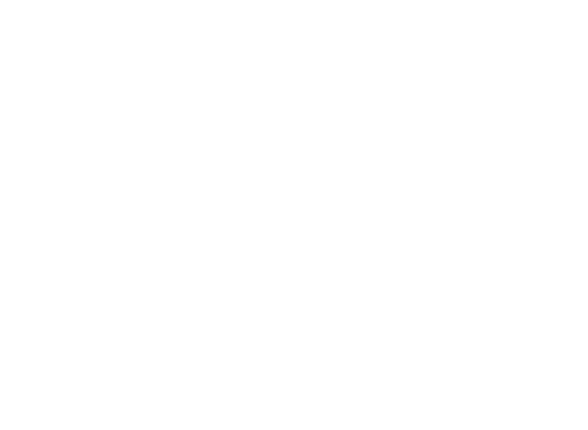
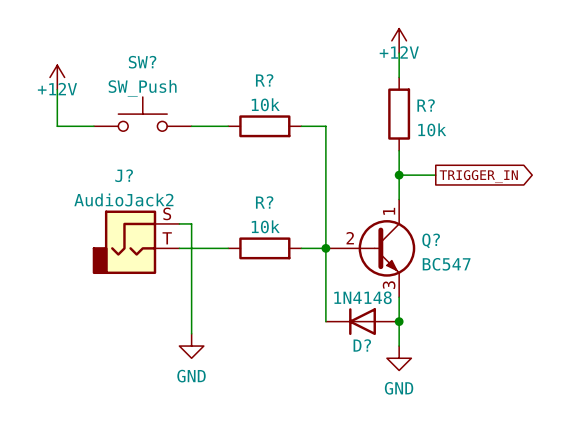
power symbol: none -> +12V (399, 40)
wire: none -> (399, 53) (399, 77)
power symbol: none -> +12V (57, 77)
wire: none -> (57, 89) (57, 126) (93, 126)
SW?: none -> SW_Push (142, 114)
R?: none -> 10k (399, 114)
wire: none -> (191, 126) (228, 126)
R?: none -> 10k (264, 126)
wire: none -> (301, 126) (325, 126) (325, 321)
wire: none -> (399, 150) (399, 199)
wire: none -> (399, 175) (435, 175)
junction: none -> (399, 175)
global label: none -> TRIGGER_IN (478, 176)
wire: none -> (179, 223) (191, 223) (191, 333)
J?: none -> AudioJack2 (136, 242)
wire: none -> (179, 248) (228, 248)
R?: none -> 10k (264, 248)
wire: none -> (301, 248) (325, 248)
junction: none -> (325, 248)
Q?: none -> BC547 (370, 248)
wire: none -> (399, 297) (399, 346)
D?: none -> 1N4148 (362, 321)
junction: none -> (399, 321)
power symbol: none -> GND (191, 346)
power symbol: none -> GND (399, 358)

